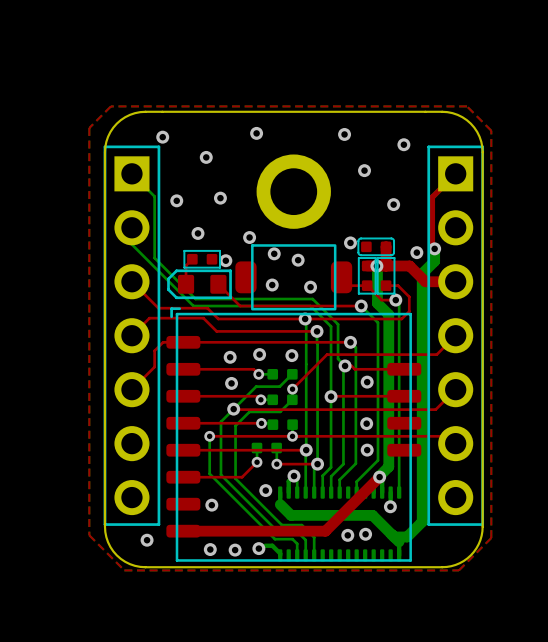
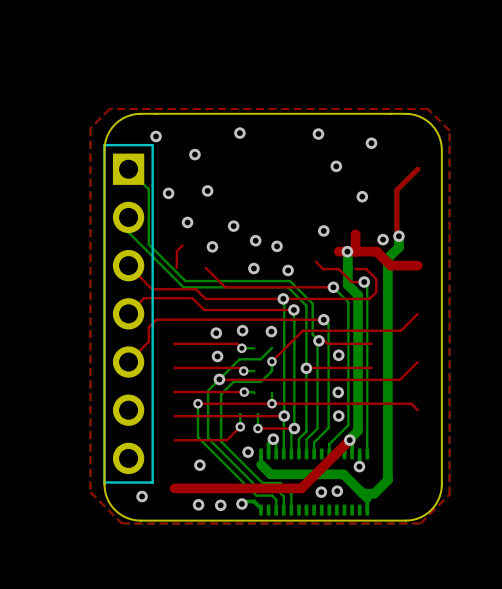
part: (293, 191) -> none
part: (376, 246) -> none
part: (202, 259) -> none
part: (367, 275) -> none
part: (386, 275) -> none
part: (293, 277) -> none
part: (199, 284) -> none
part: (455, 335) -> none
part: (282, 374) -> none
part: (282, 399) -> none
part: (282, 424) -> none
part: (293, 434) -> none
part: (266, 448) -> none

